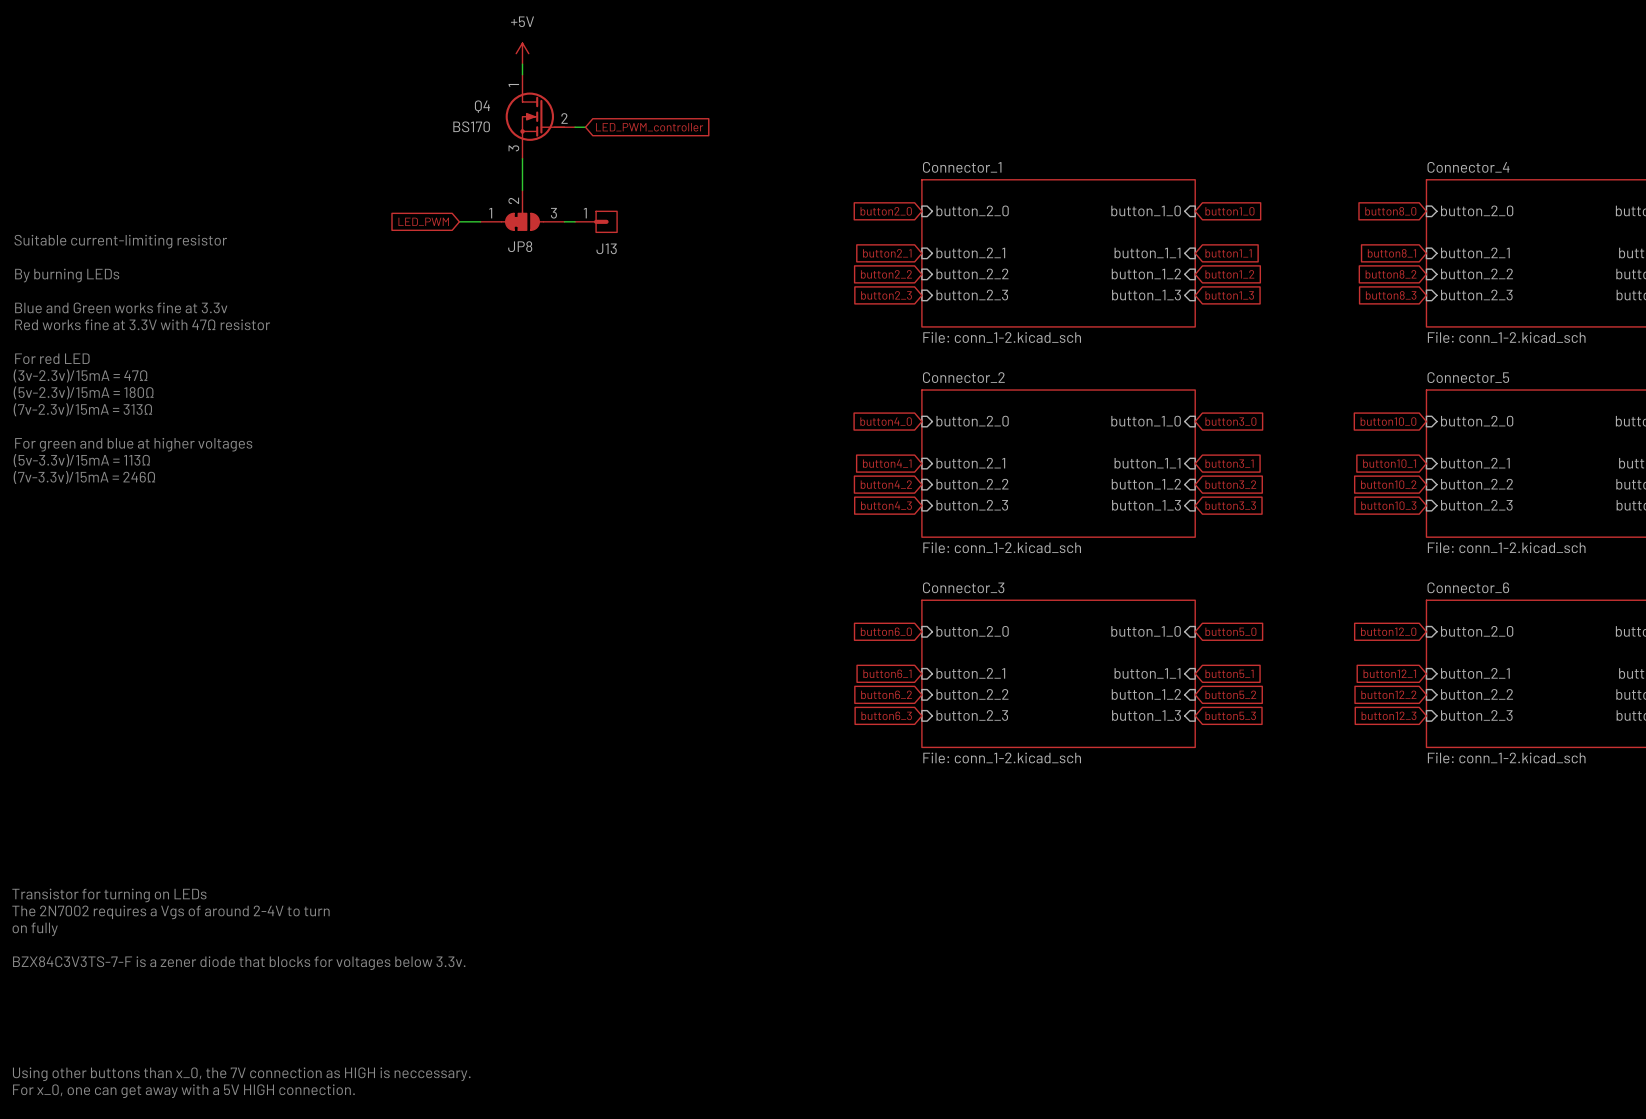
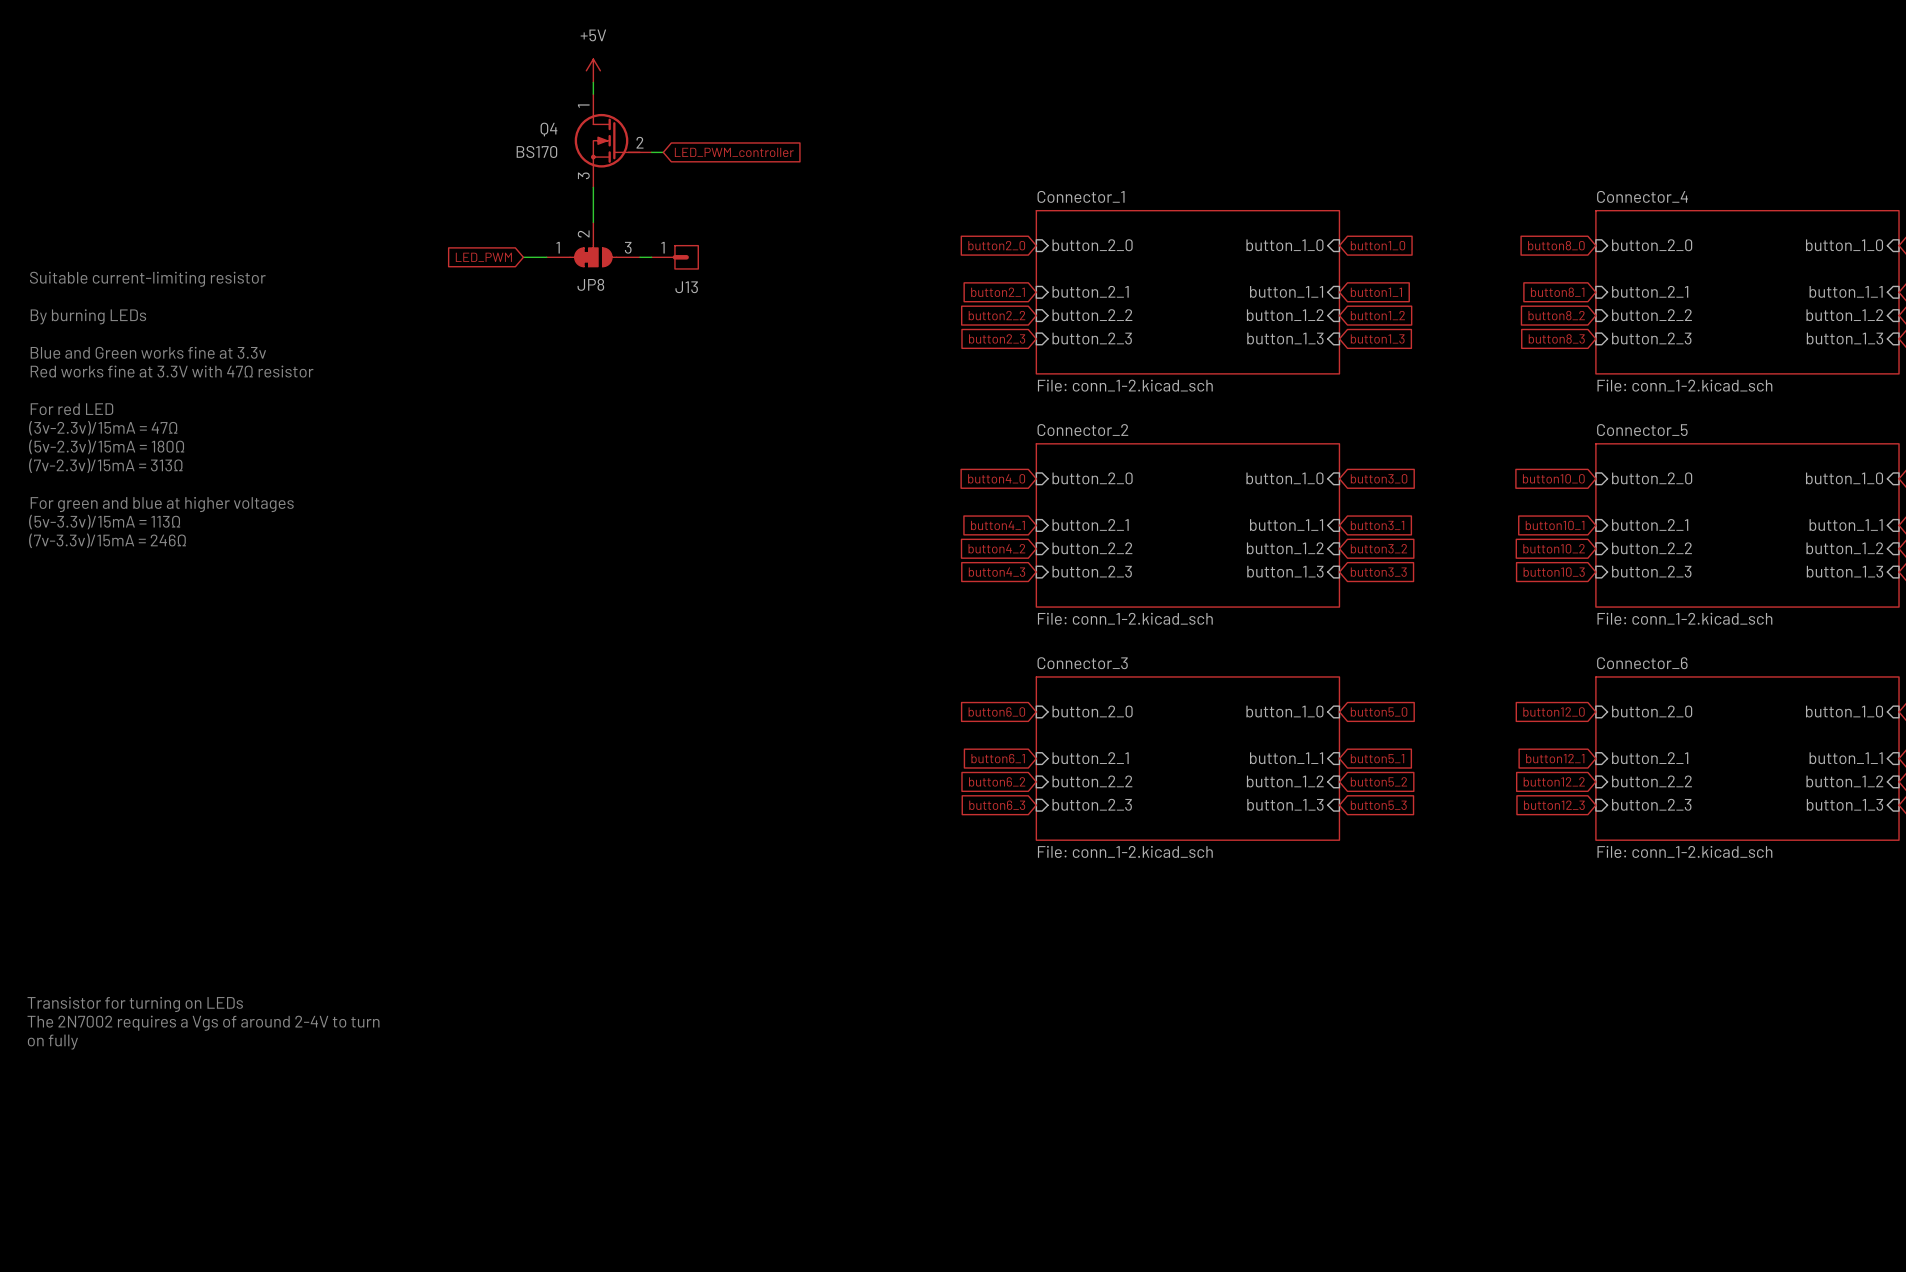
text: BZX84C3V3TS-7-F is a zener diode that blocks for voltages below 3.3v. (239, 963) -> none
text: Using other buttons than x_0, the 7V connection as HIGH is neccessary. (241, 1074) -> none
text: For x_0, one can get away with a 5V HIGH connection. (183, 1091) -> none

